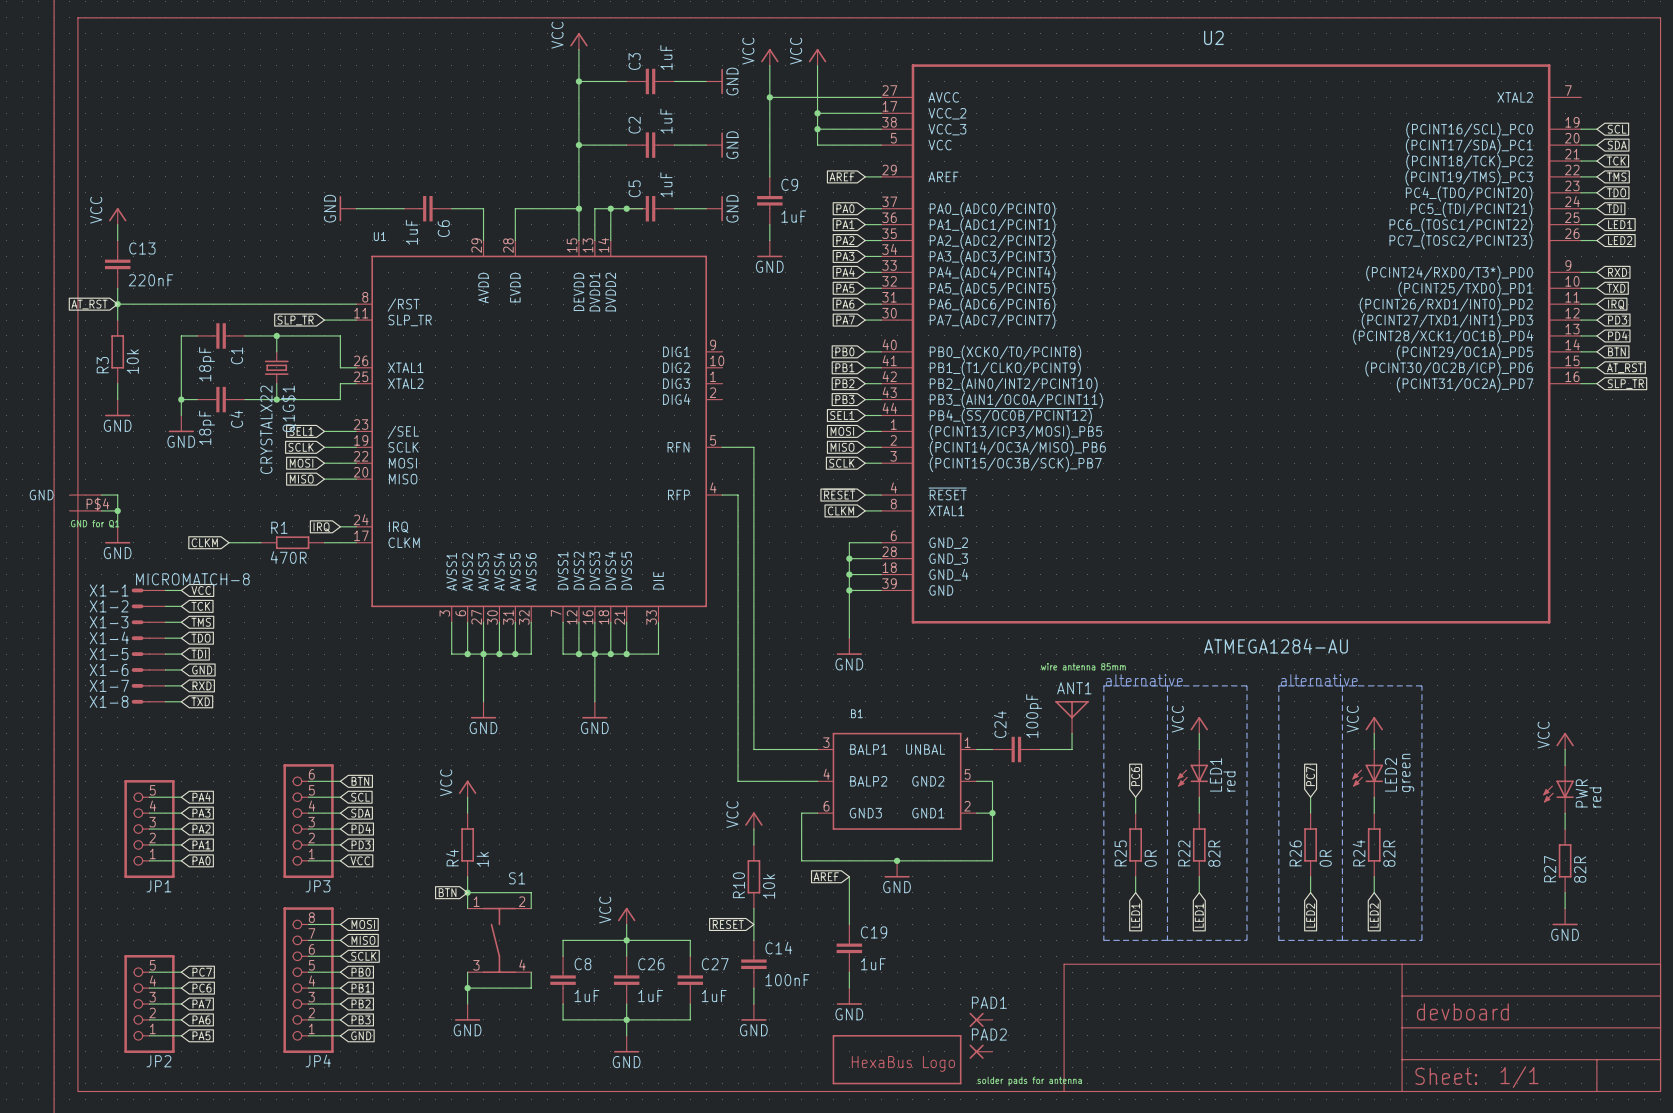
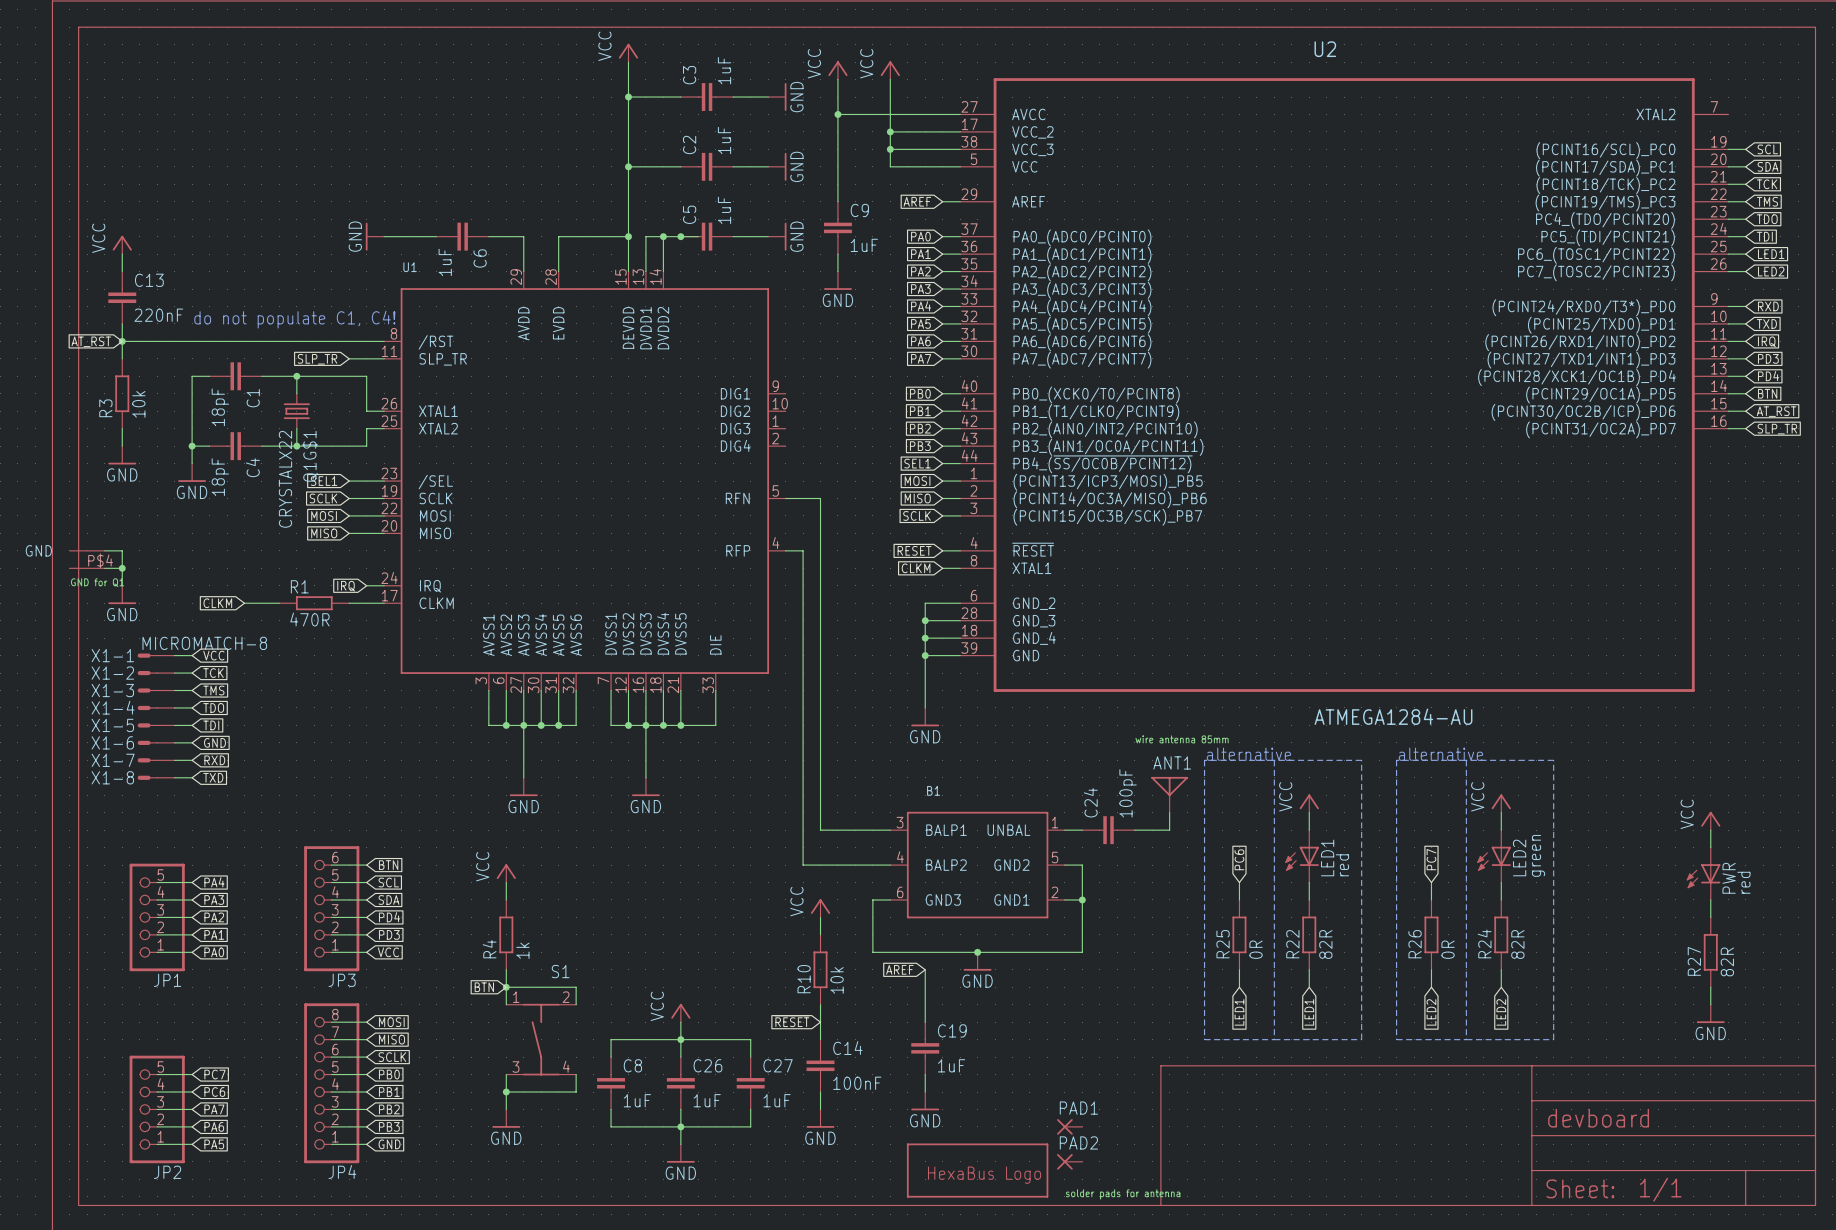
text: none -> do not populate C1, C4! (294, 319)

